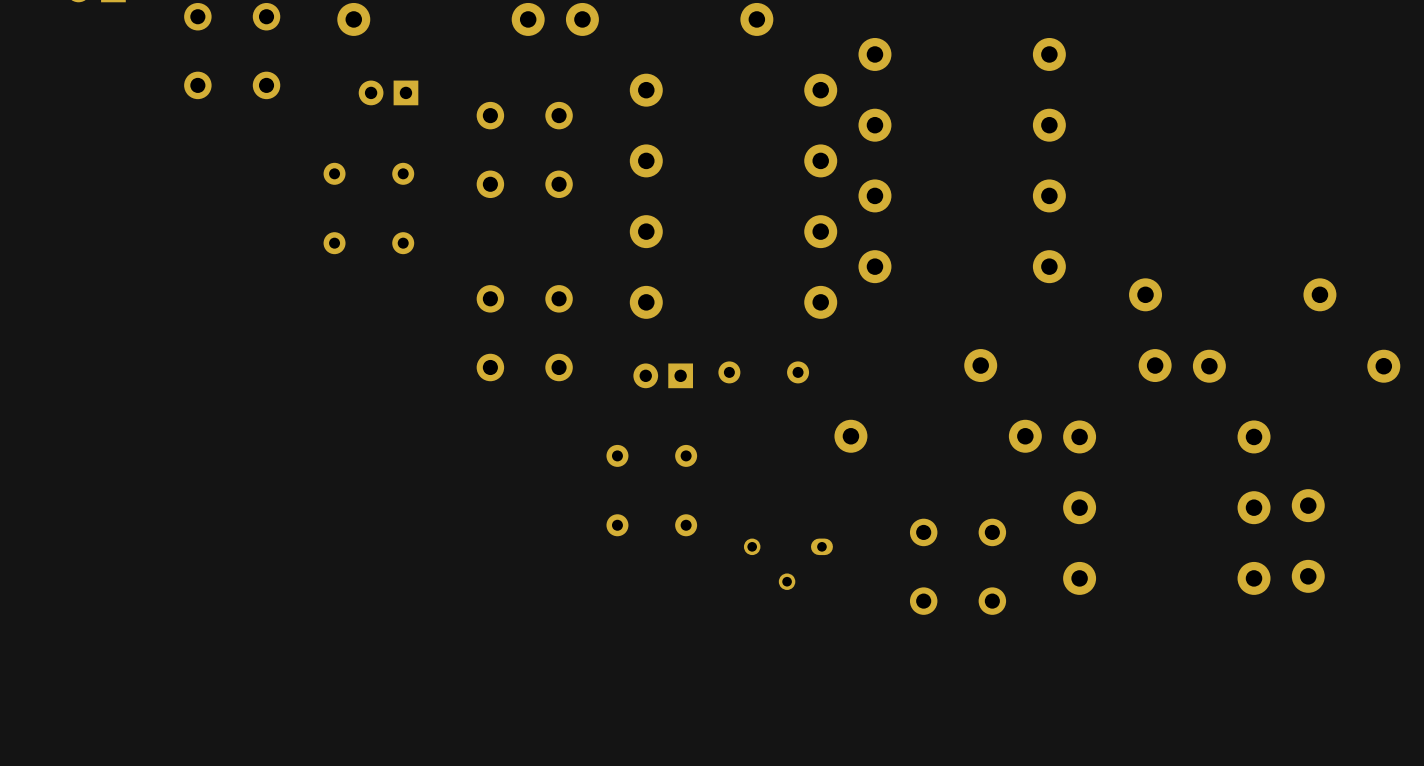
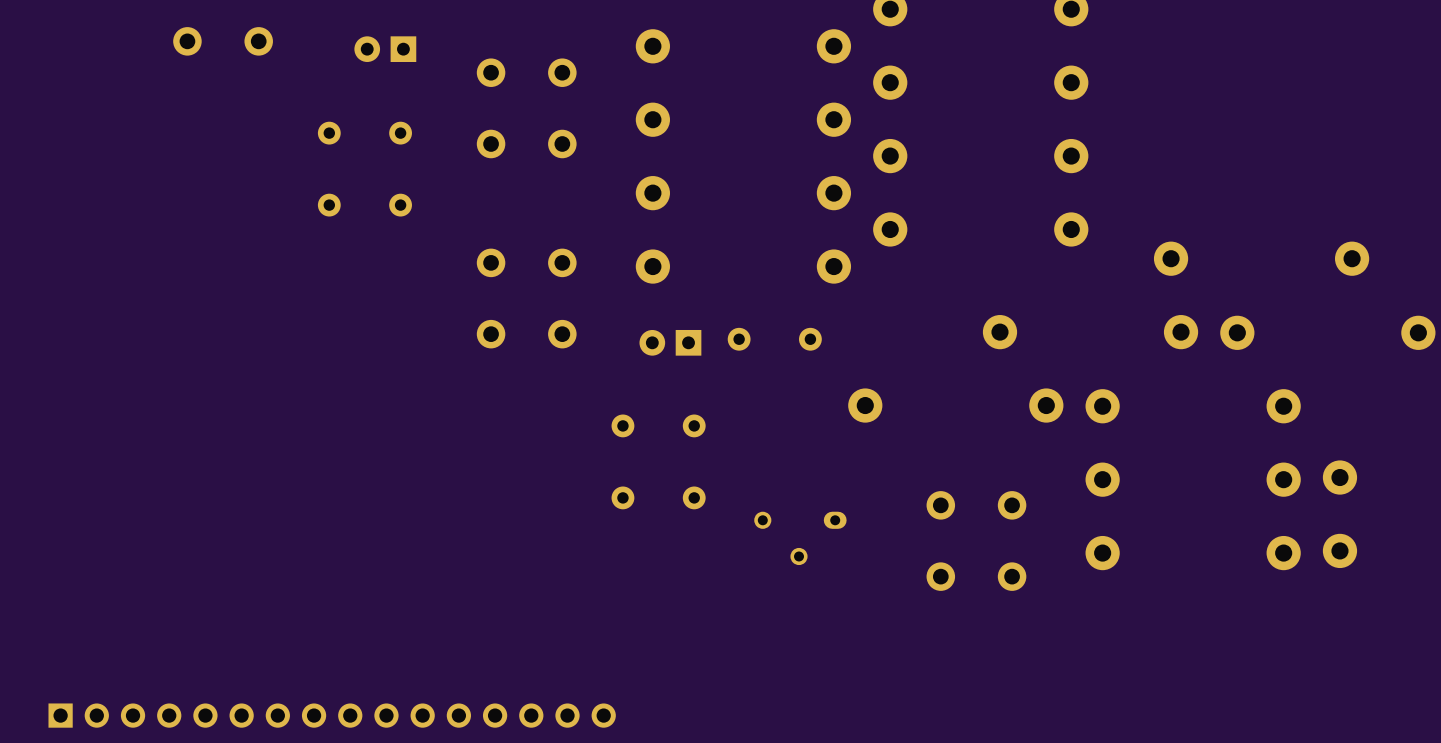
part: none -> (332, 715)

